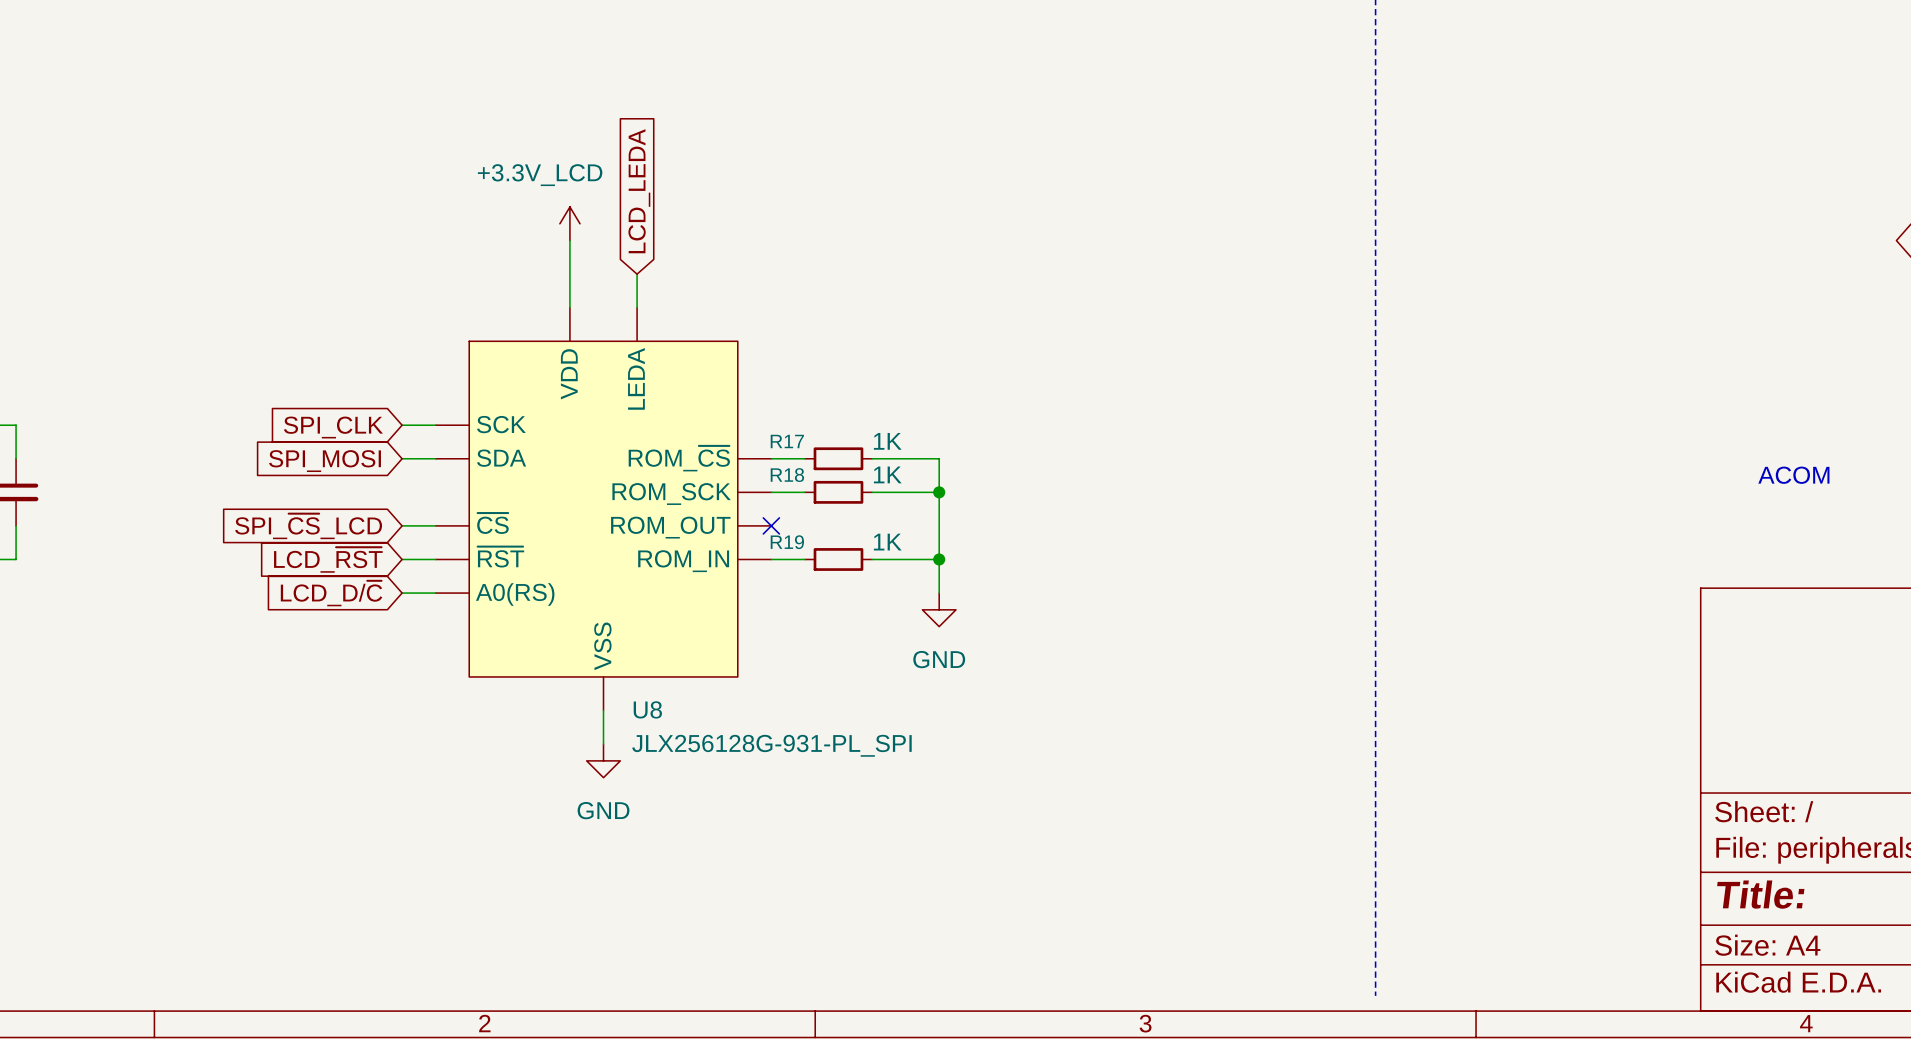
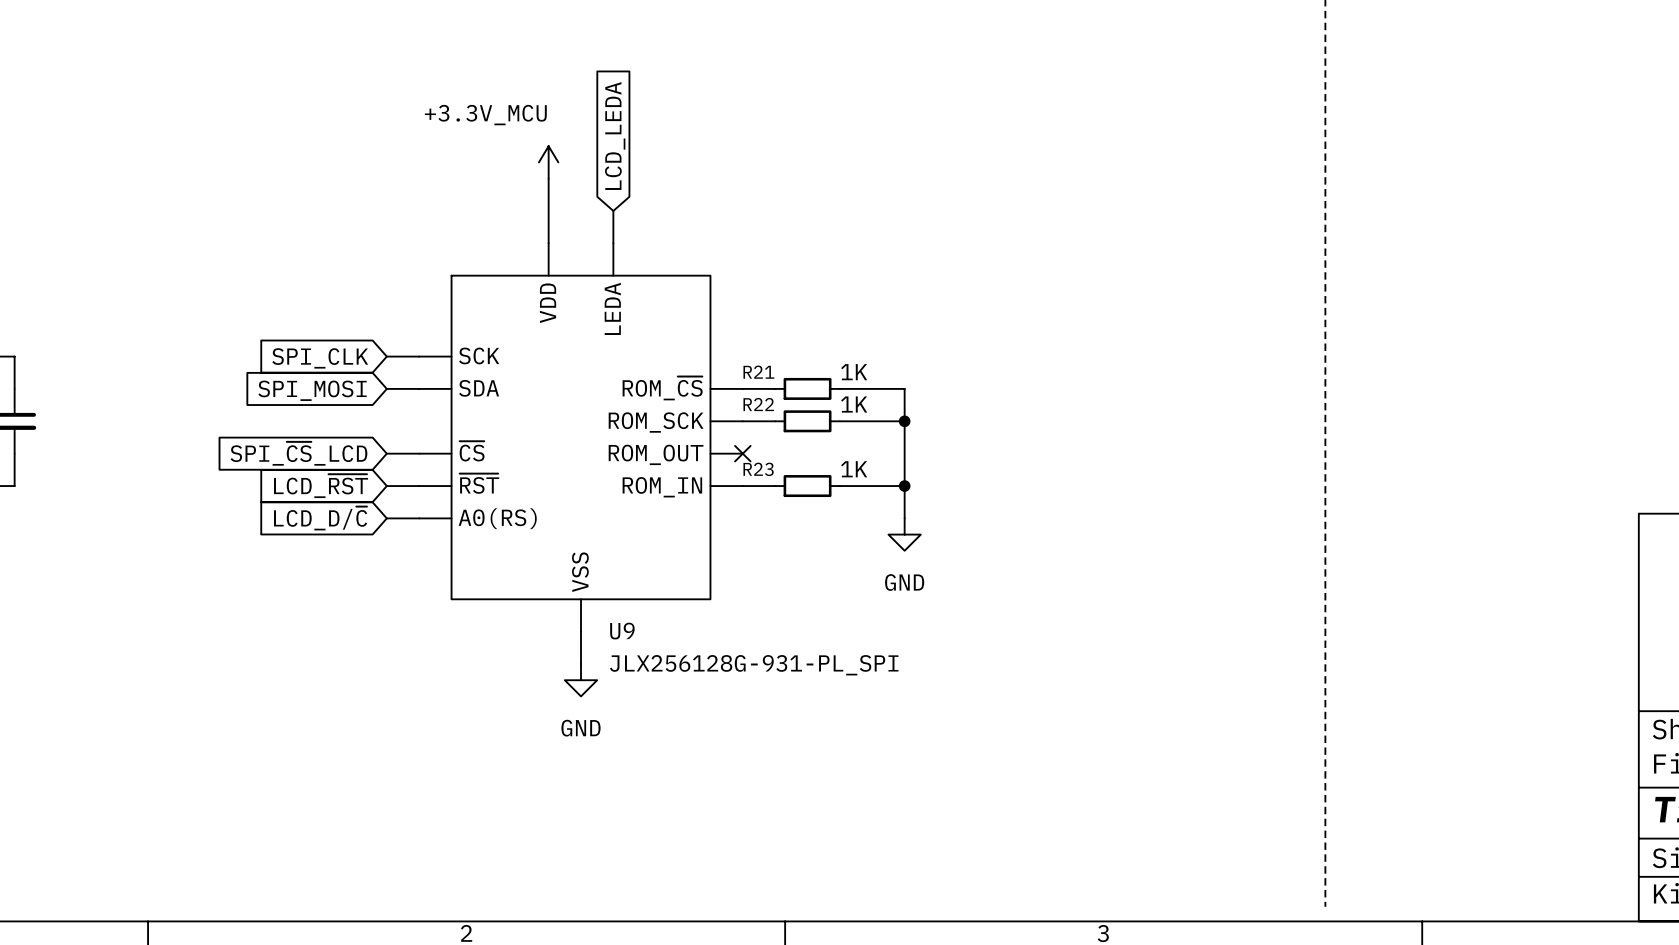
power symbol: +3.3V_LCD (569, 223) -> +3.3V_MCU (548, 162)
R17 name: R17 (787, 441) -> R21 (758, 372)
R18 name: R18 (787, 475) -> R22 (758, 404)
R19 name: R19 (787, 542) -> R23 (758, 469)
U8 name: U8 (647, 709) -> U9 (622, 631)

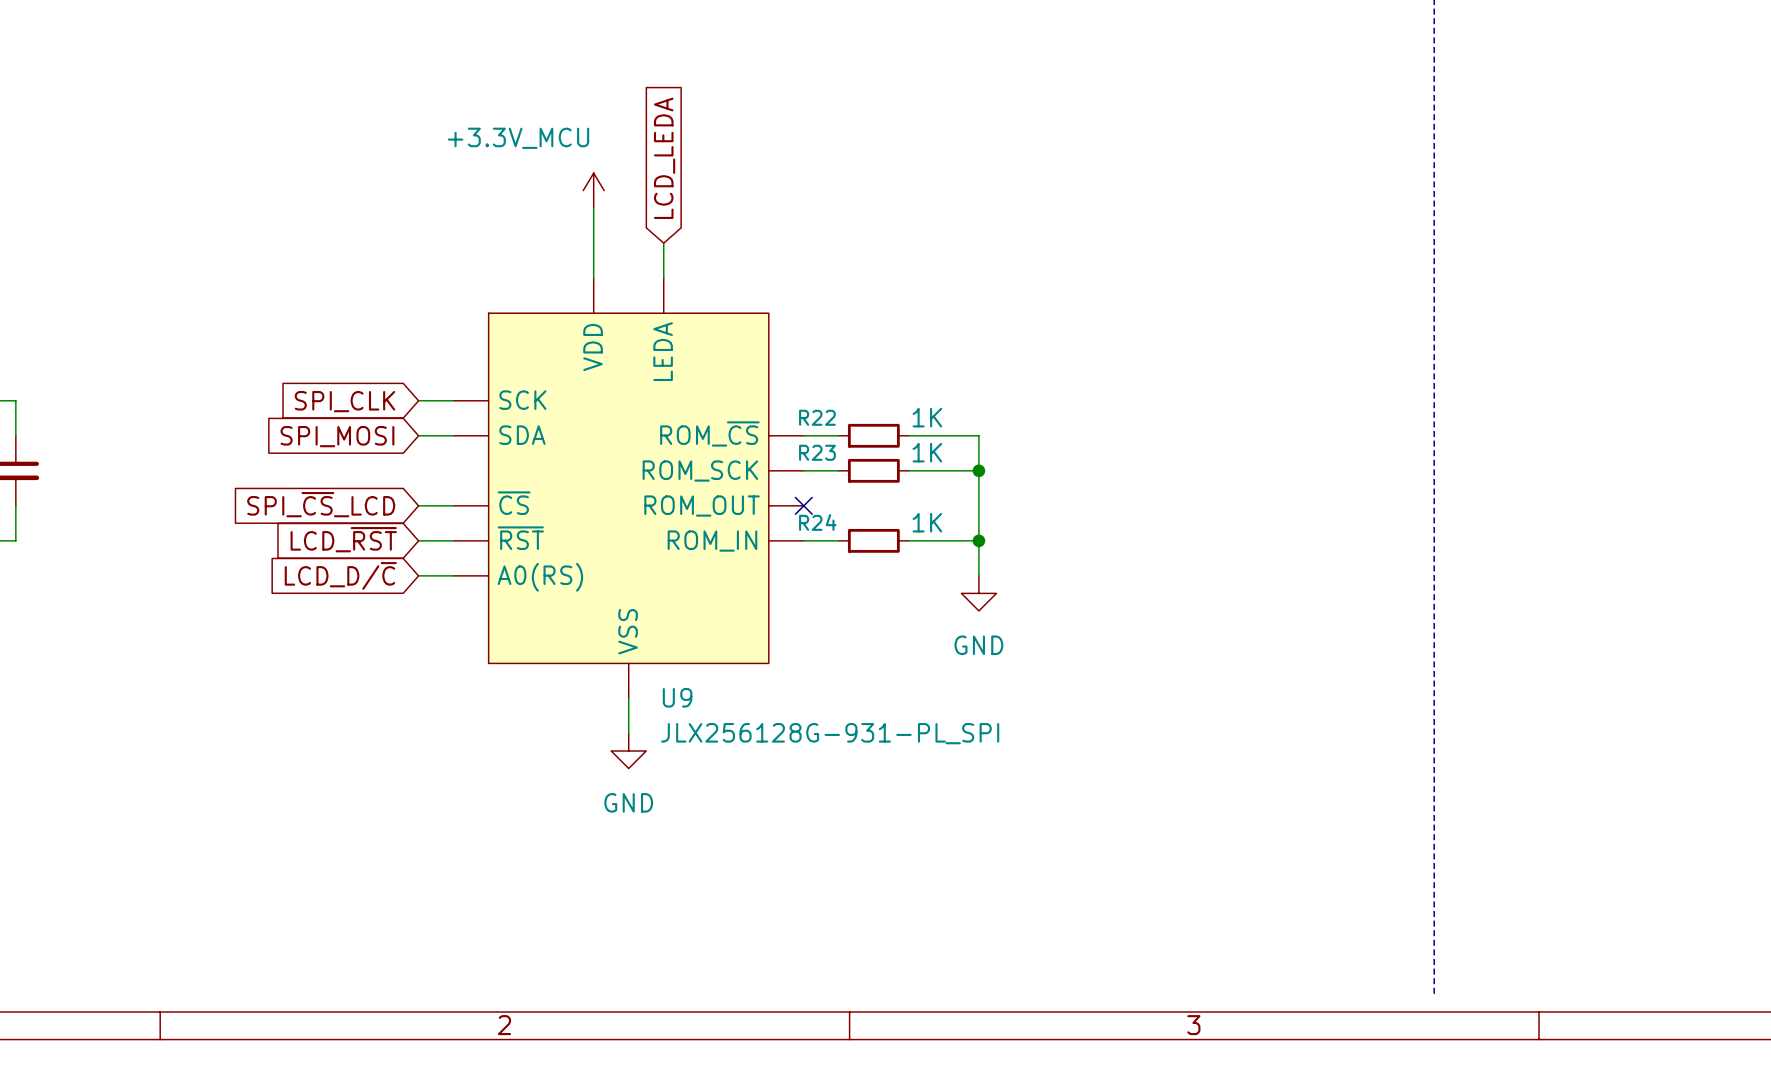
R21 name: R21 (758, 372) -> R22 (817, 417)
R22 name: R22 (758, 404) -> R23 (817, 452)
R23 name: R23 (758, 469) -> R24 (817, 522)

